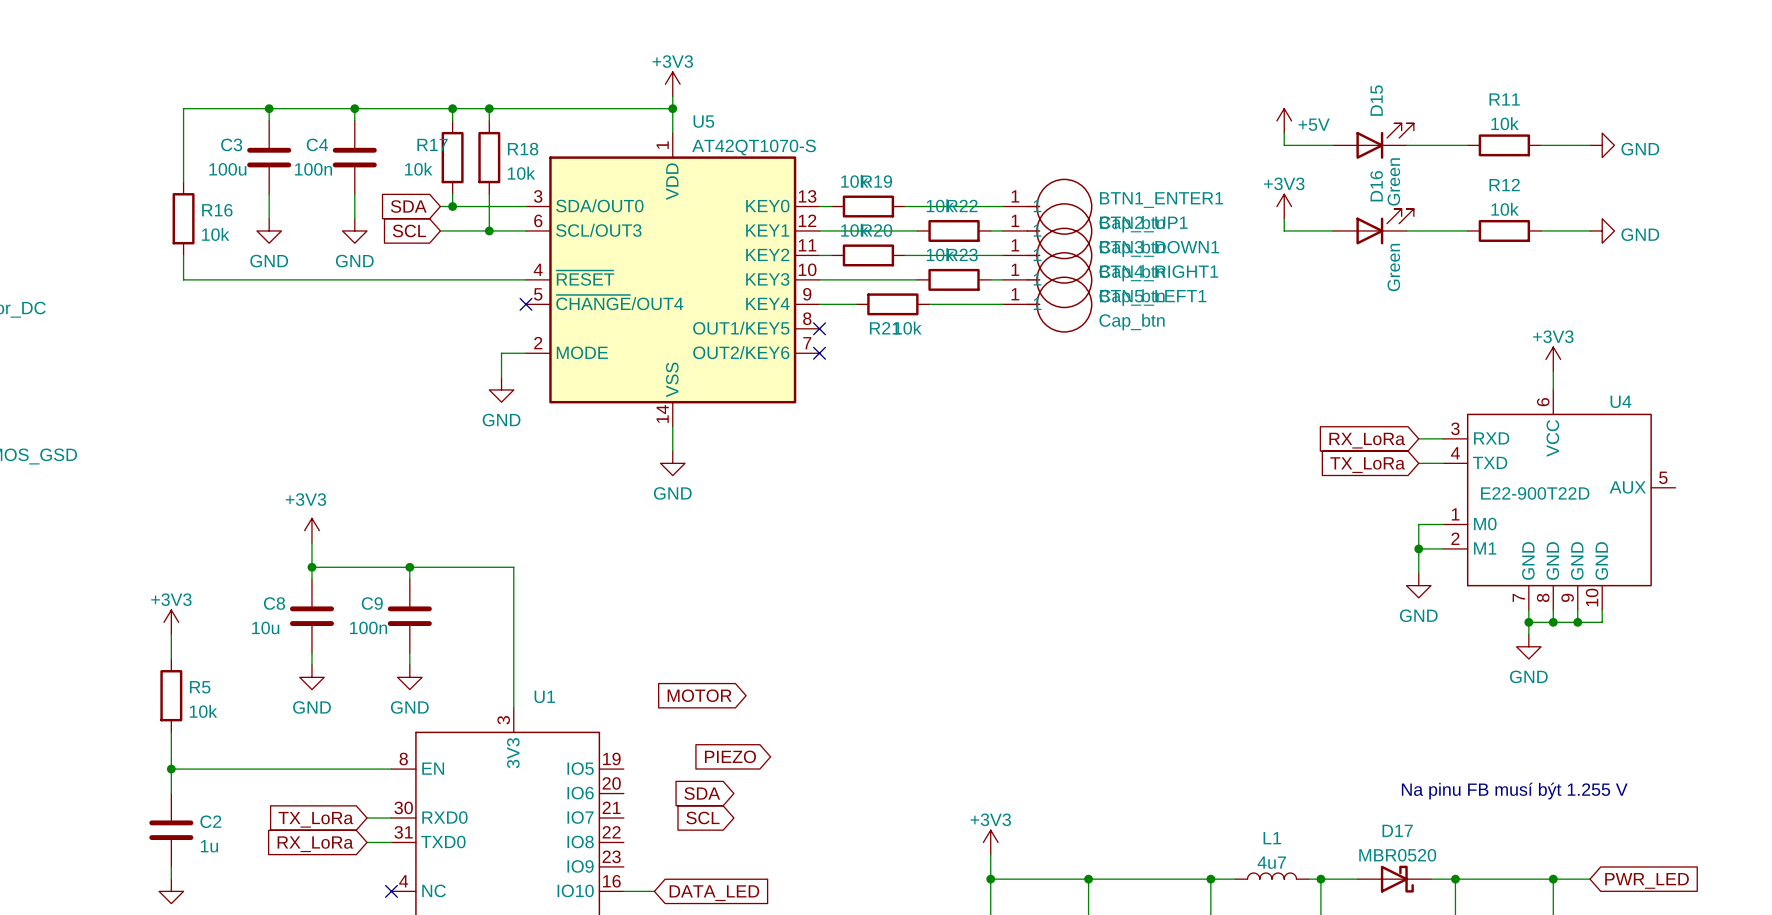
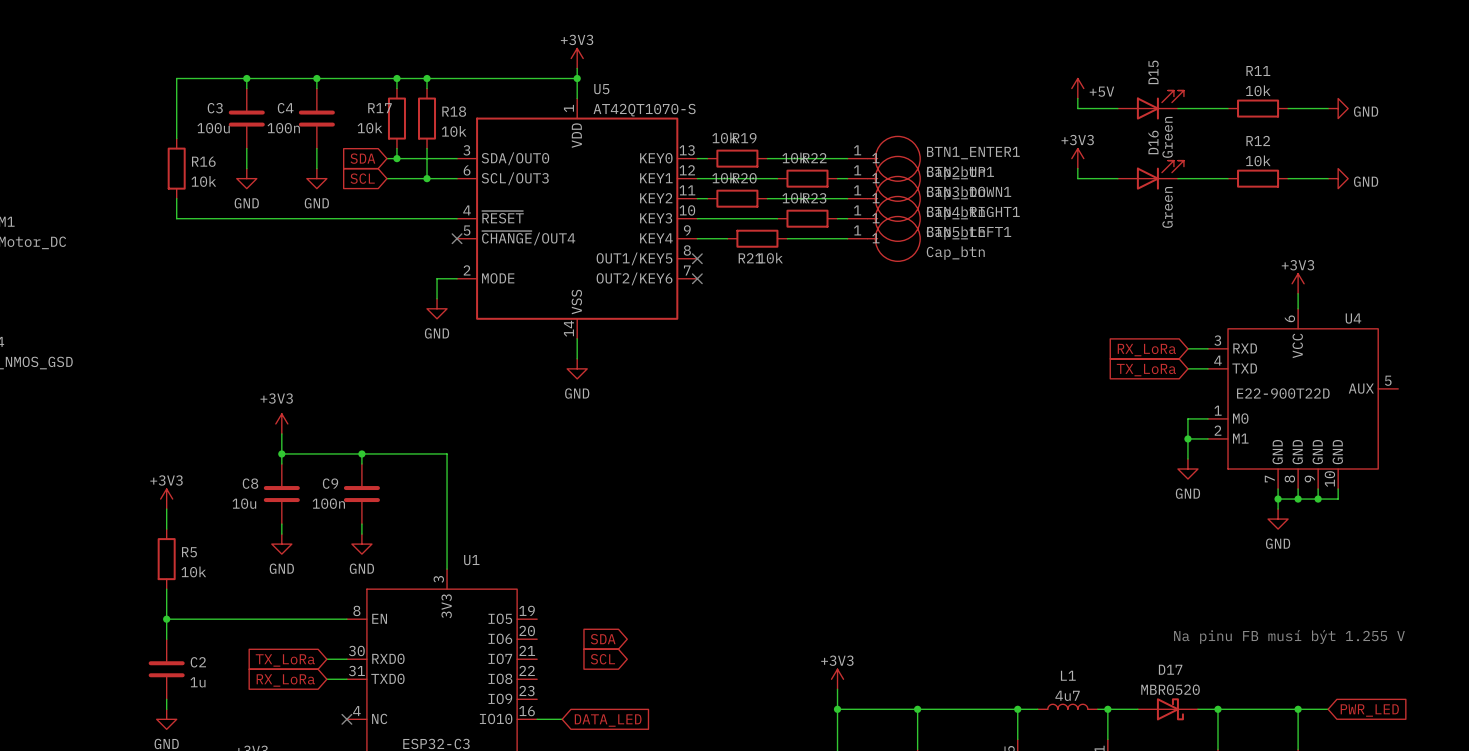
global label: MOTOR (699, 695) -> none
global label: PIEZO (730, 756) -> none

